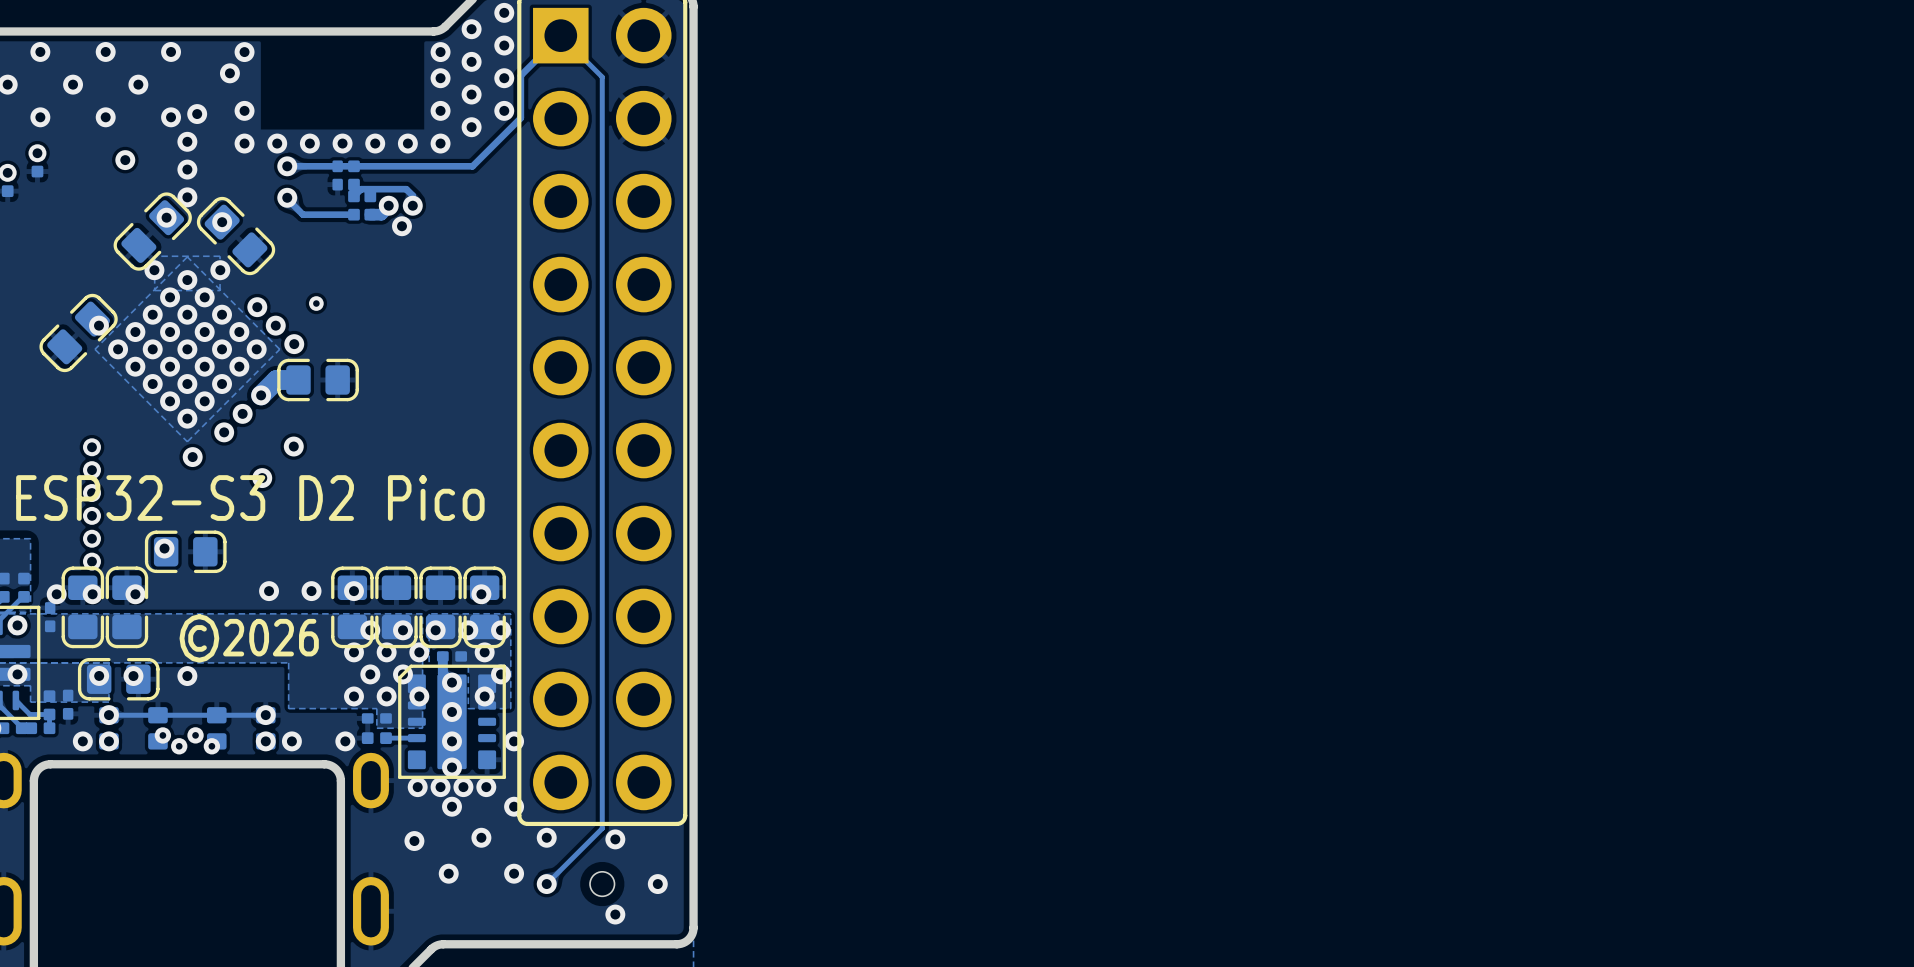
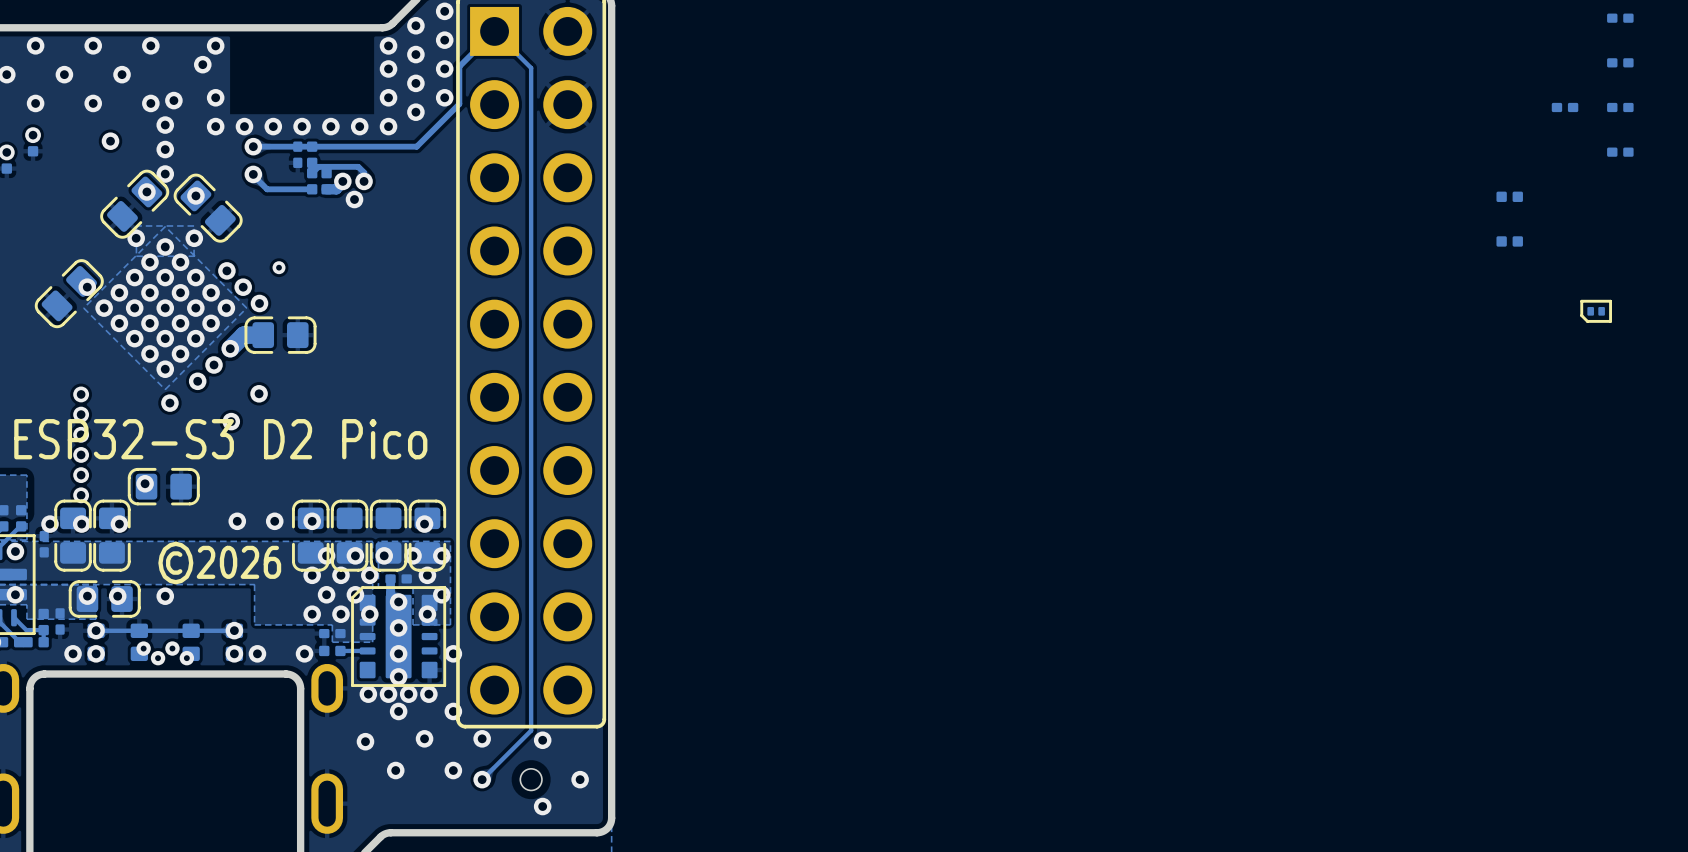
part: none -> (1620, 18)
part: none -> (1620, 62)
part: none -> (1565, 107)
part: none -> (1620, 107)
part: none -> (1620, 152)
part: none -> (1509, 196)
part: none -> (1509, 241)
part: none -> (1596, 311)

